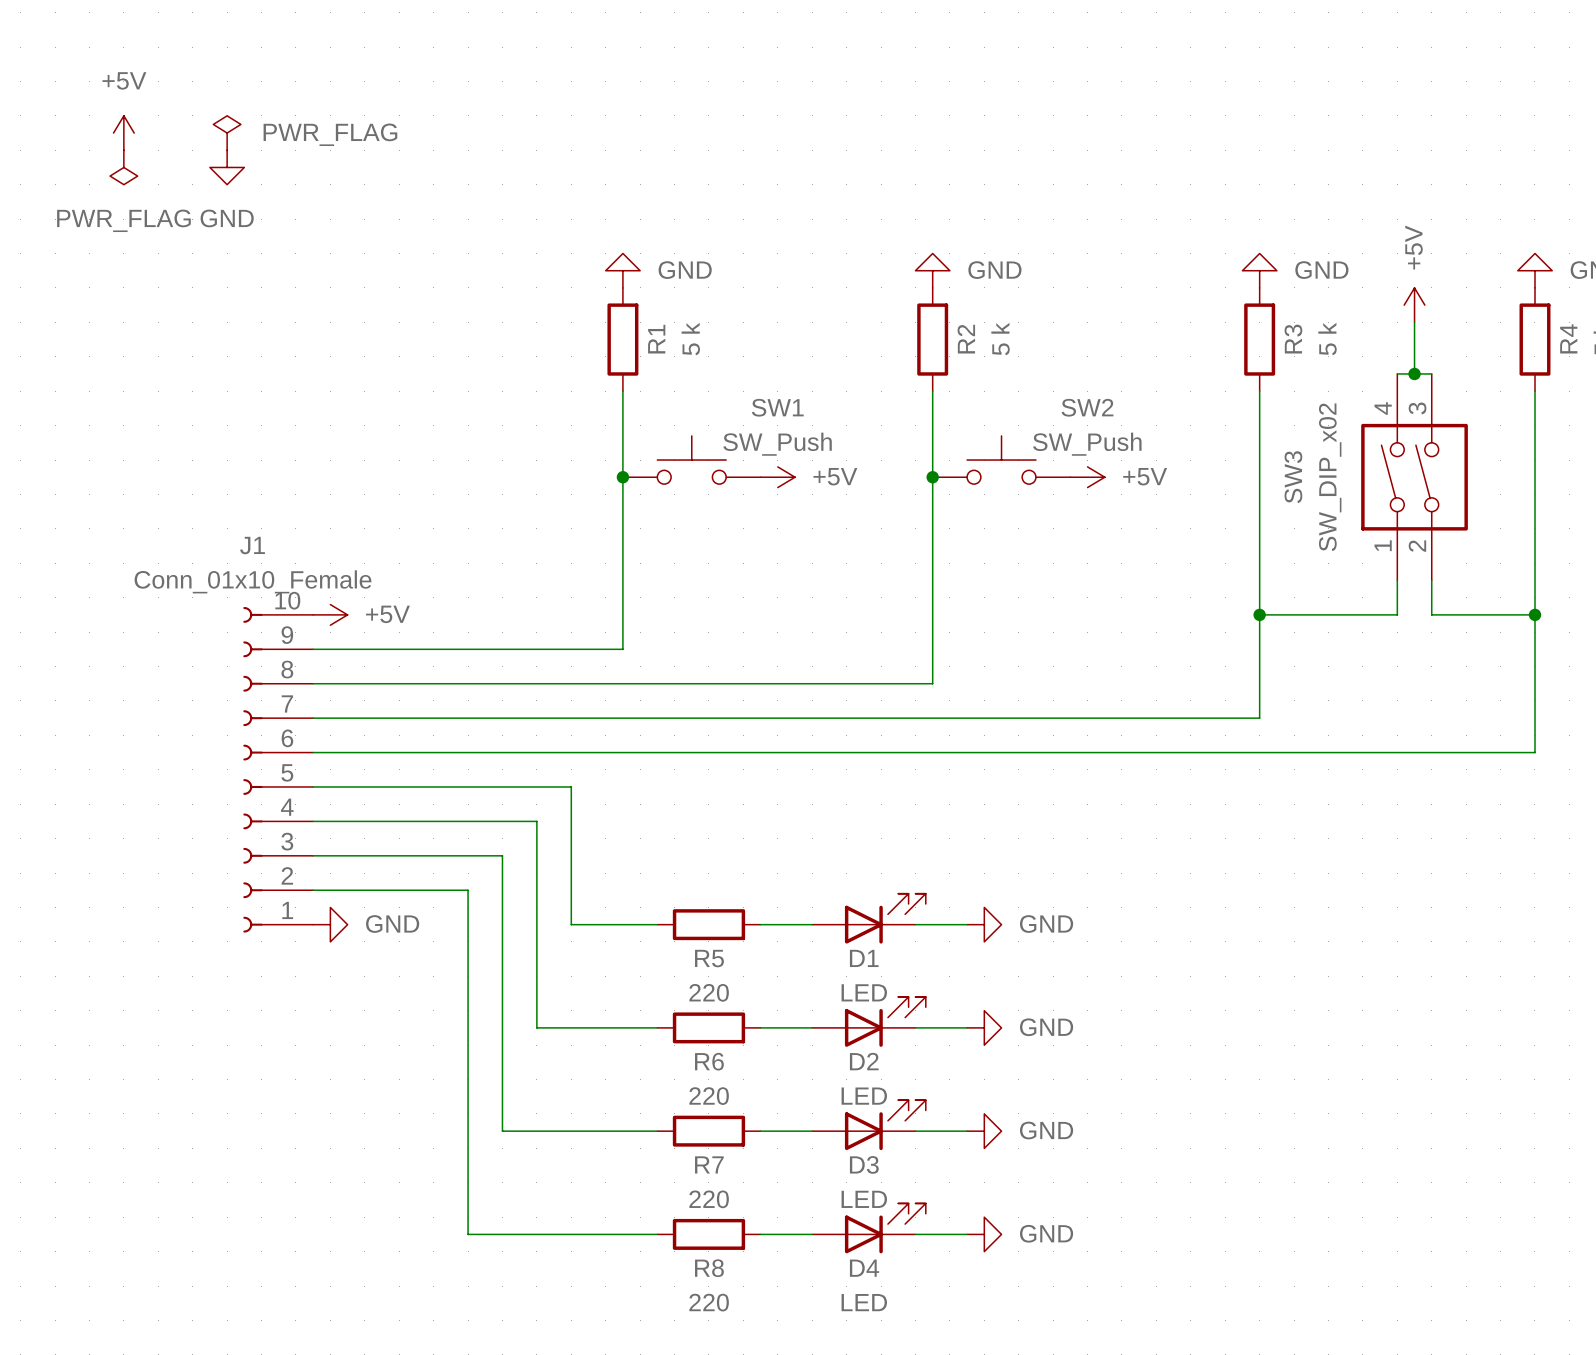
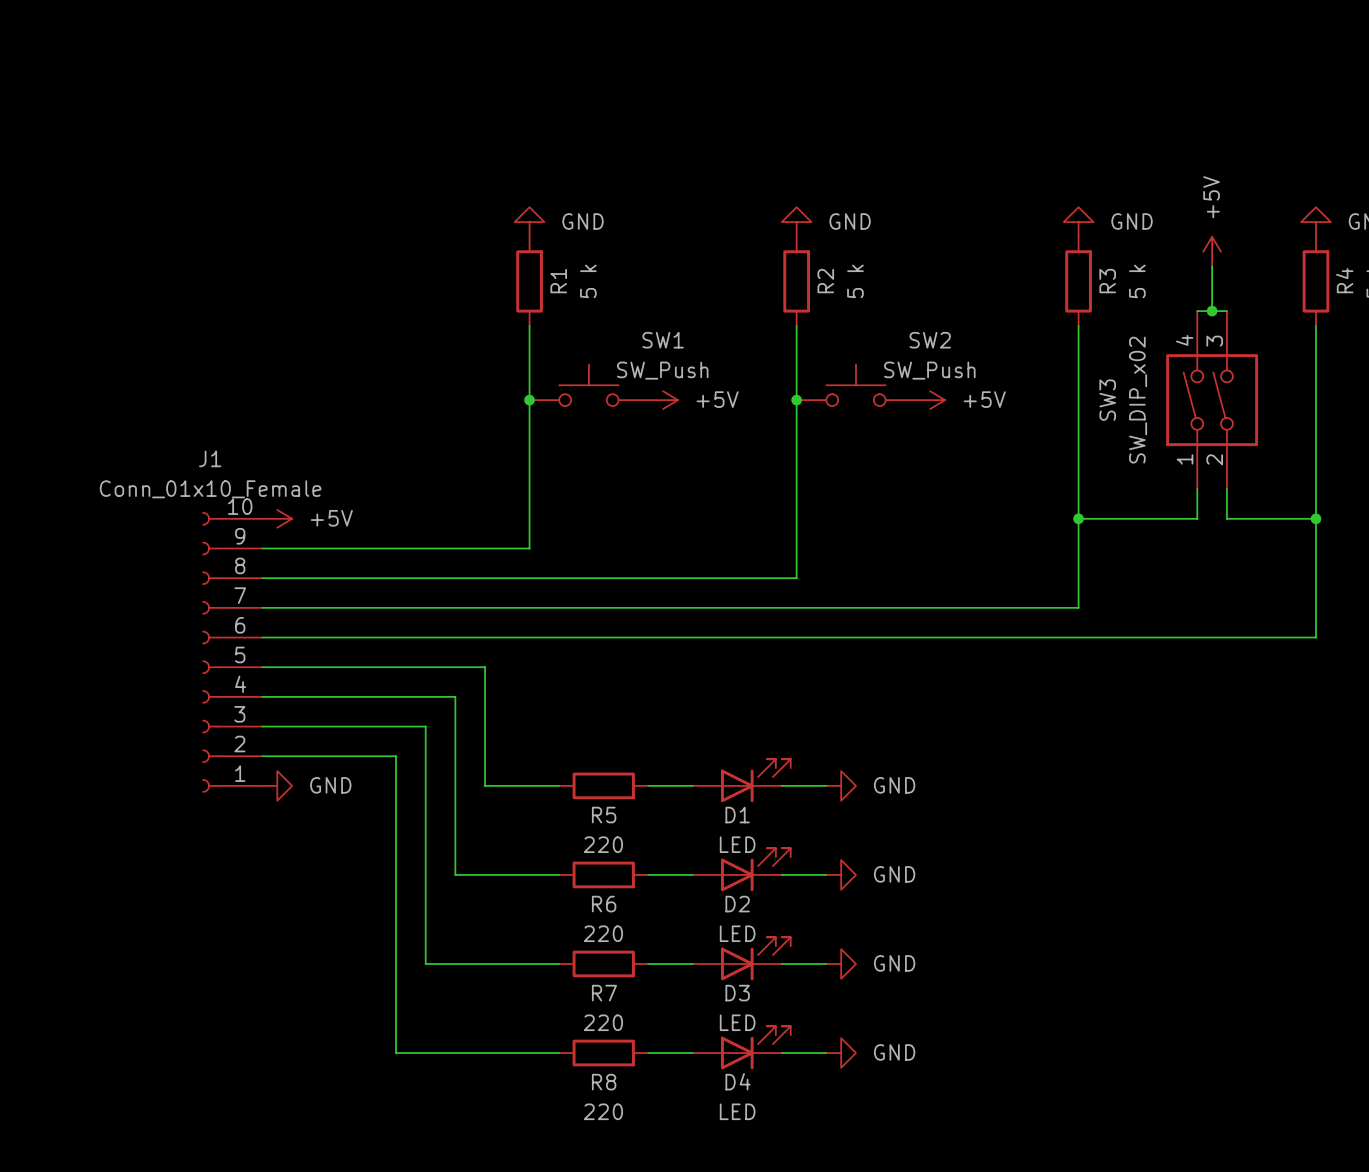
power symbol: +5V (123, 133) -> none
power symbol: PWR_FLAG (227, 133) -> none
power symbol: PWR_FLAG (123, 167) -> none
power symbol: GND (227, 167) -> none

